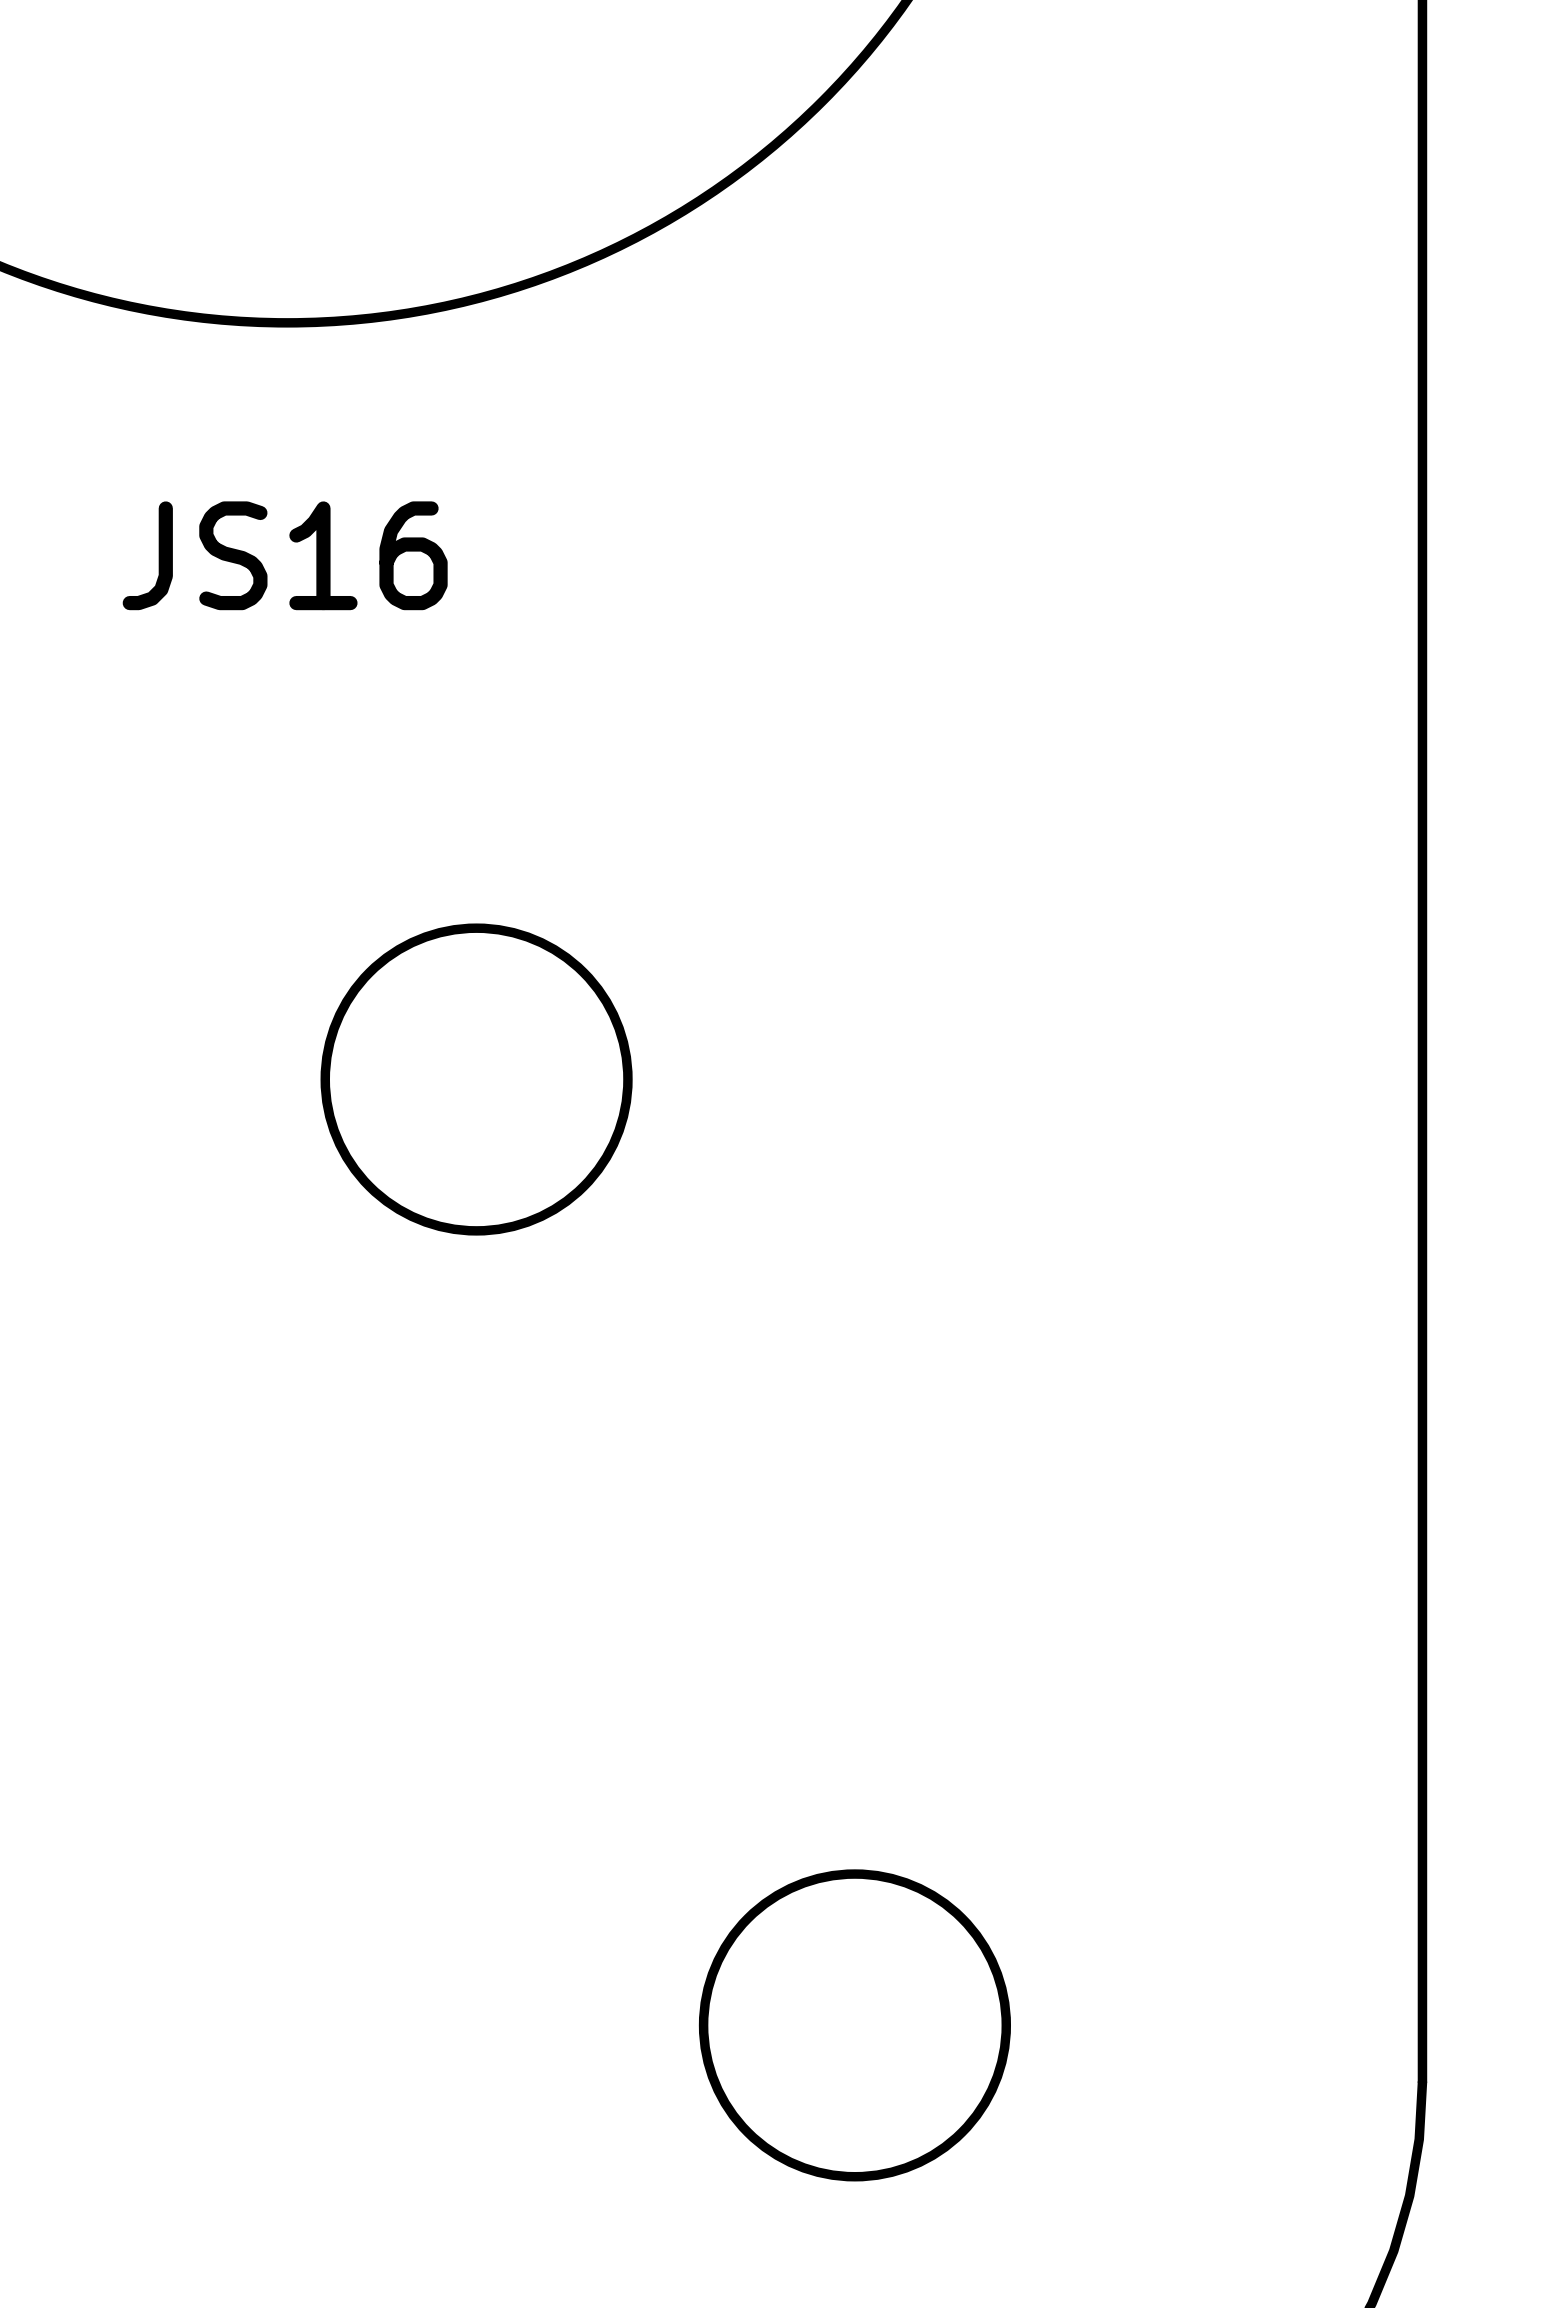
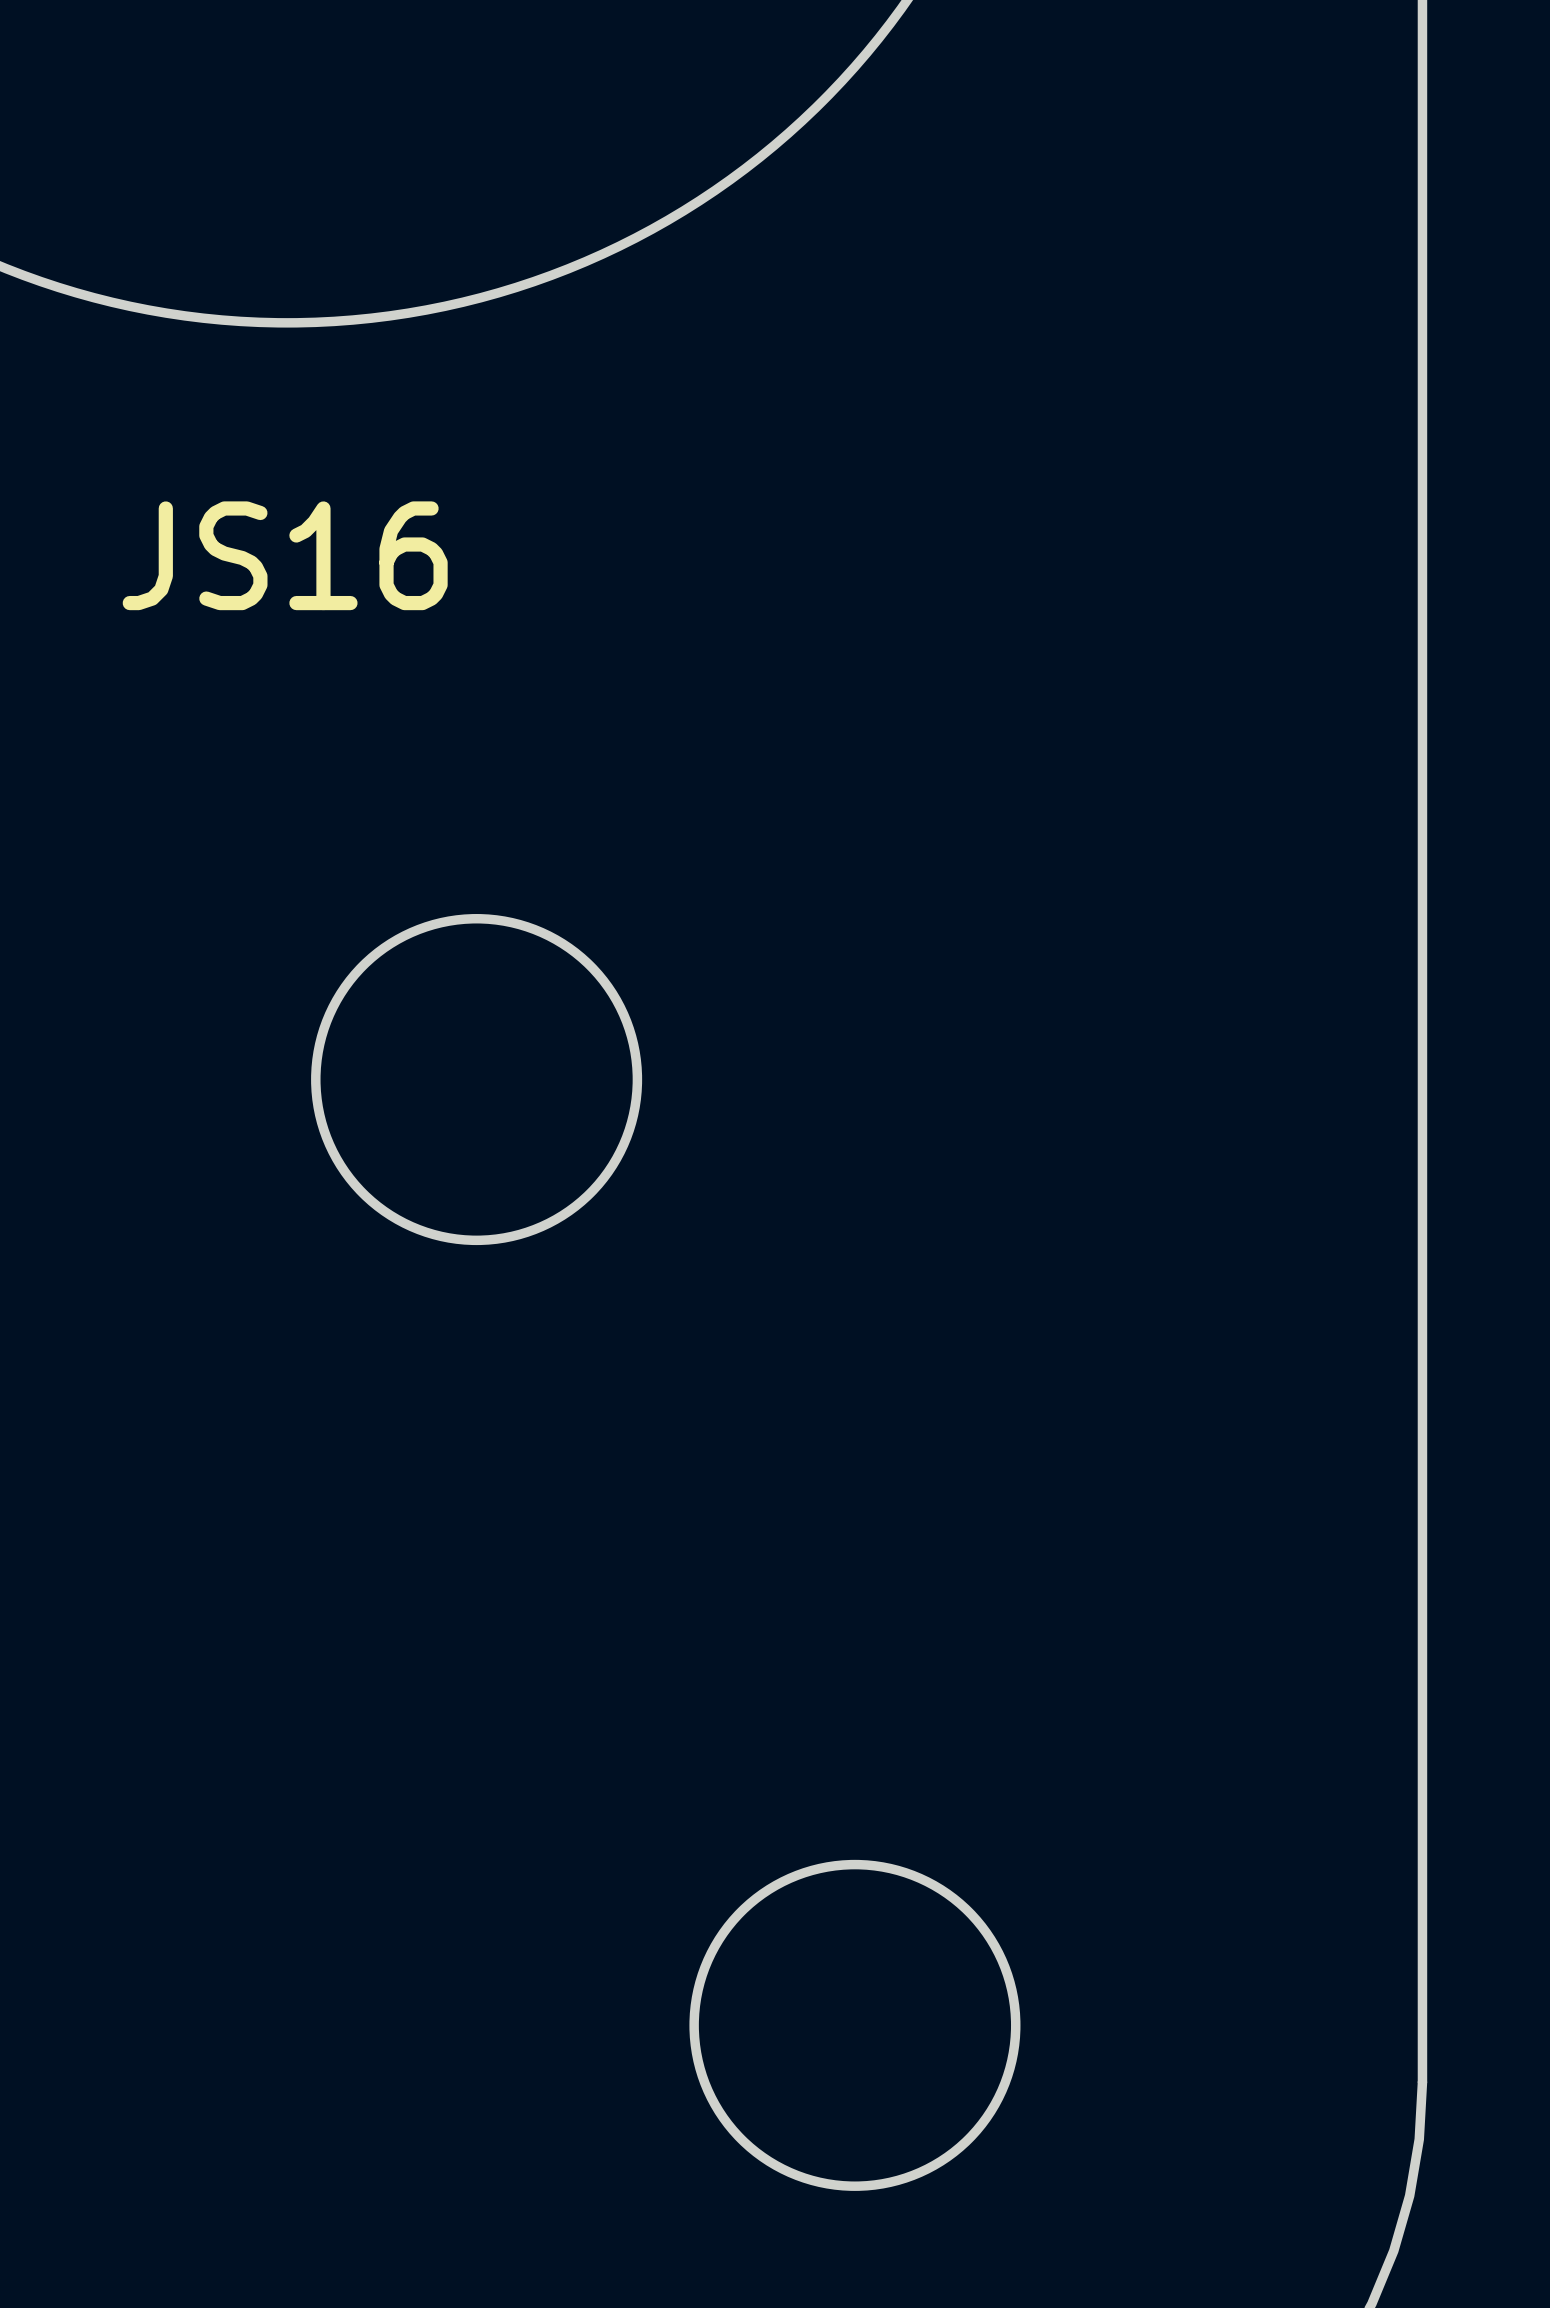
round board edge size: [320, 923, 633, 1236] -> [311, 914, 643, 1246]
round board edge size: [698, 1869, 1012, 2182] -> [689, 1859, 1021, 2191]

